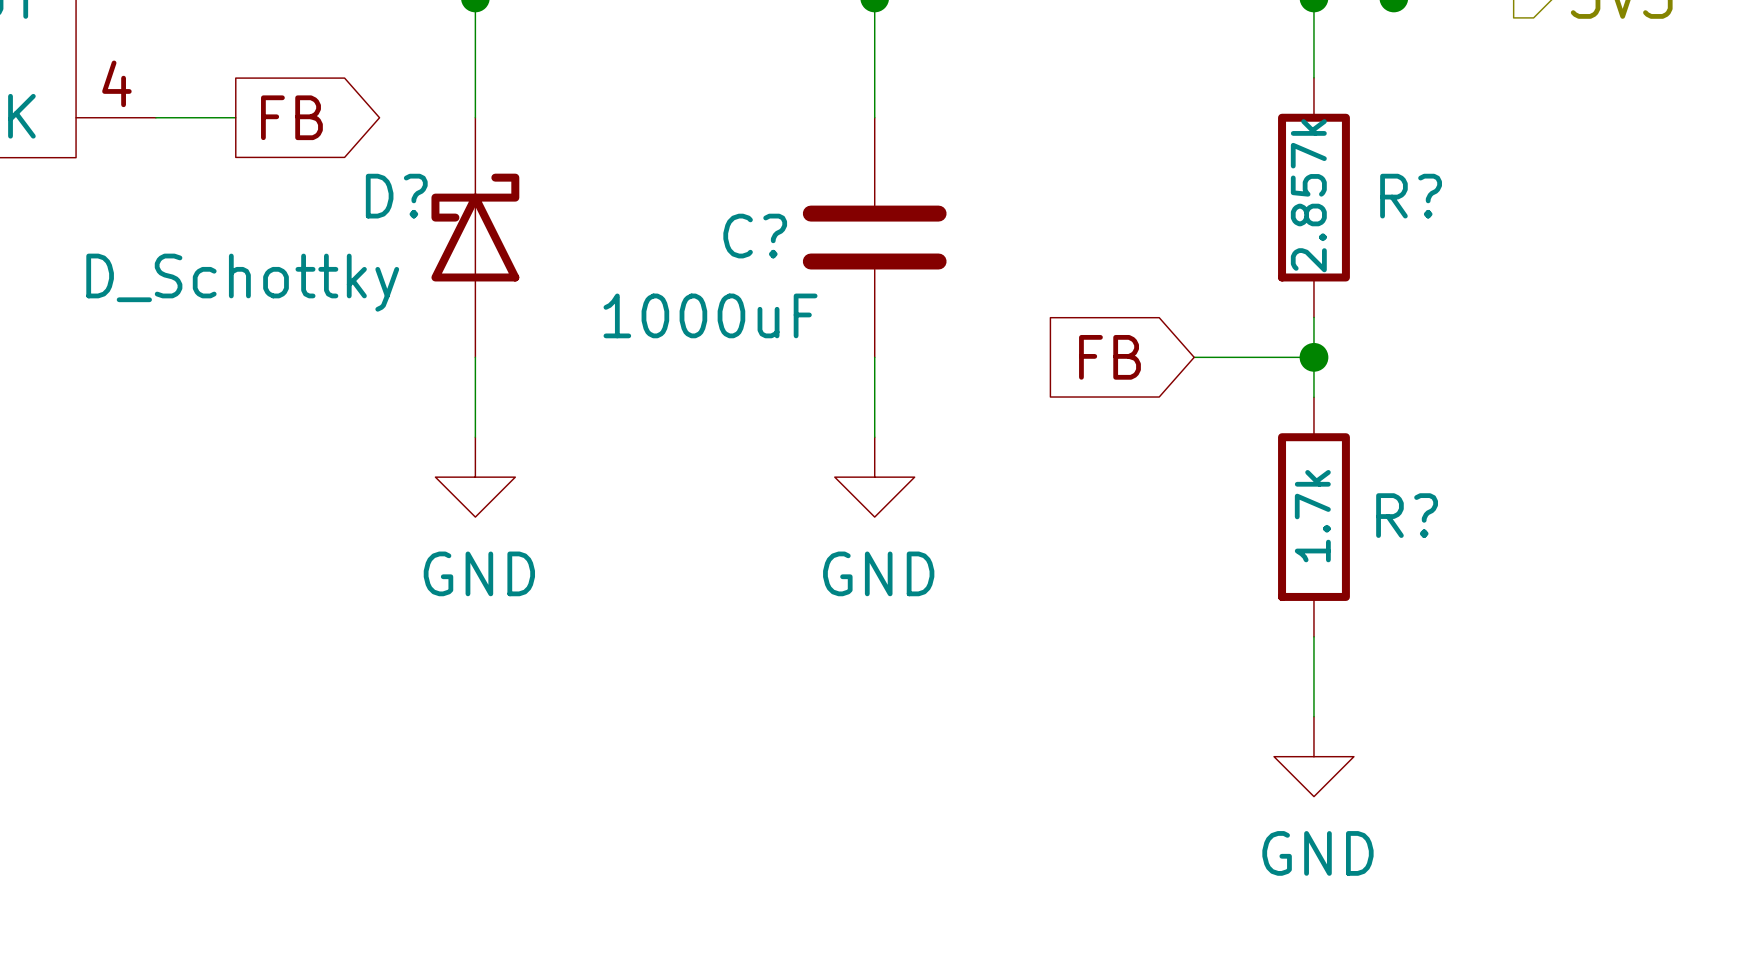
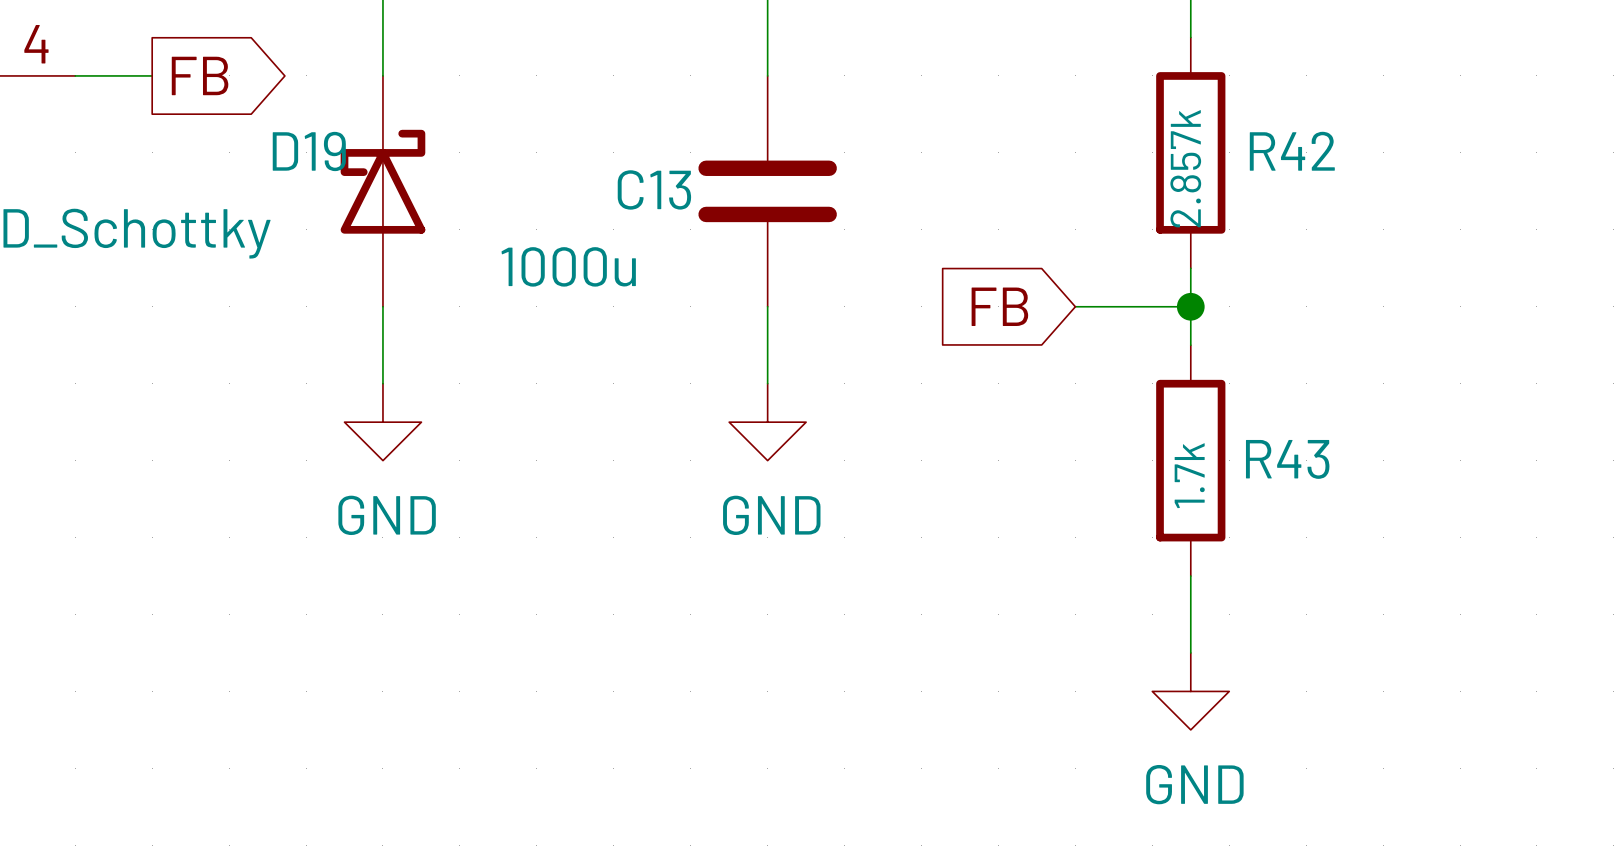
D? name: D? (396, 196) -> D19 (309, 151)
R? name: R? (1411, 196) -> R42 (1292, 151)
C? name: C? (755, 236) -> C13 (654, 189)
C? value: 1000uF (710, 315) -> 1000u (568, 266)
R? name: R? (1407, 515) -> R43 (1287, 459)

